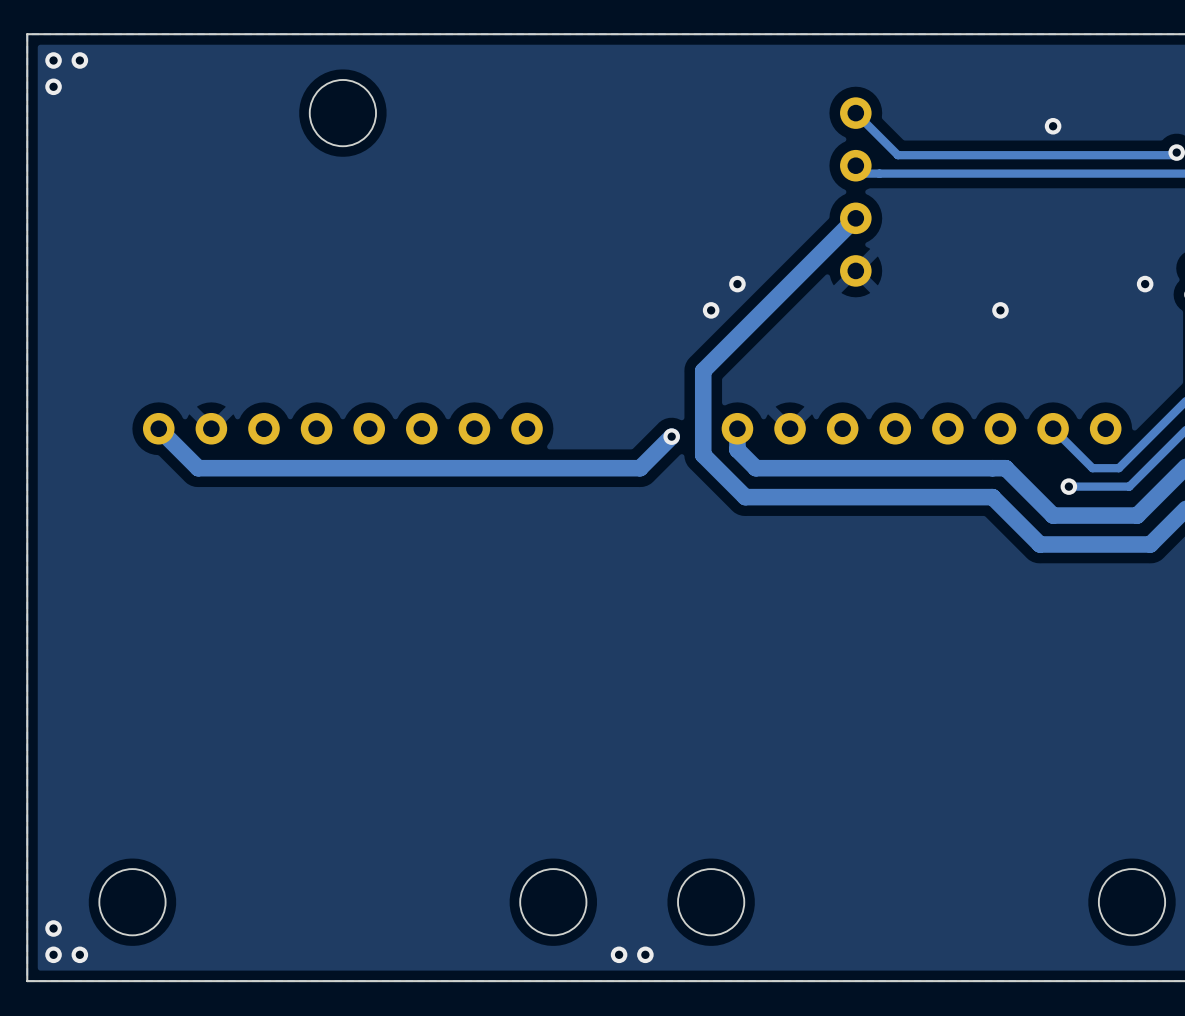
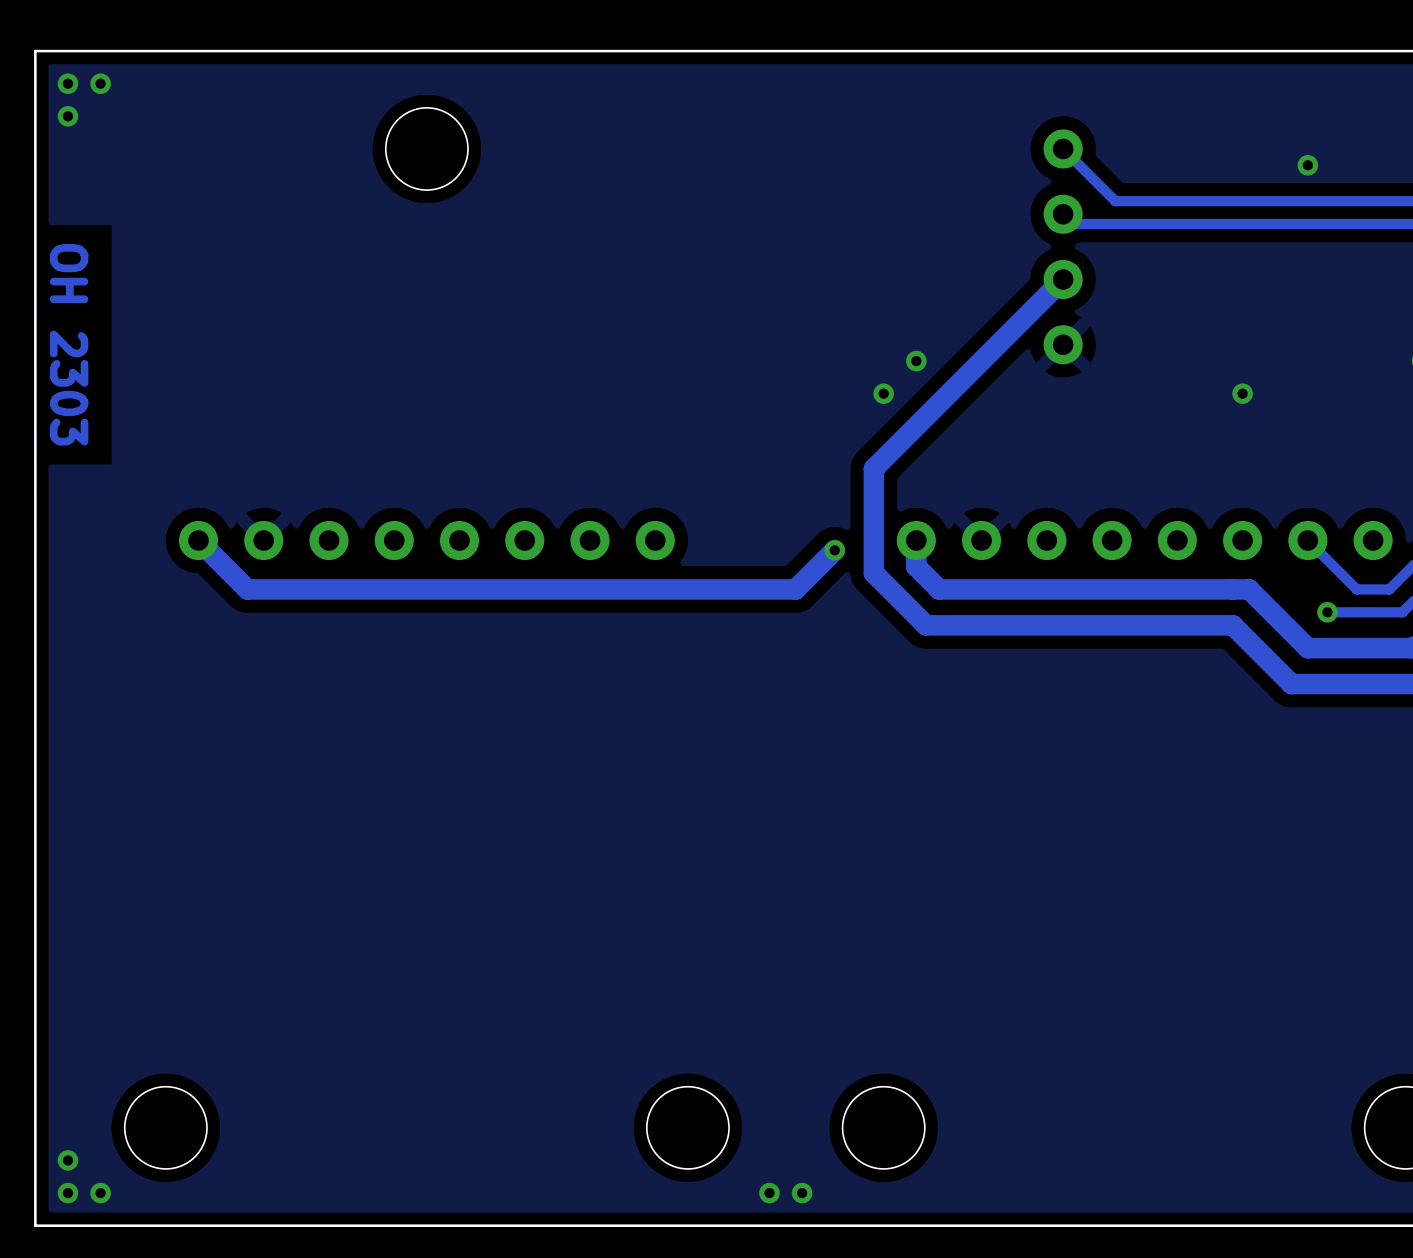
text: none -> OH 2303 (69, 344)

